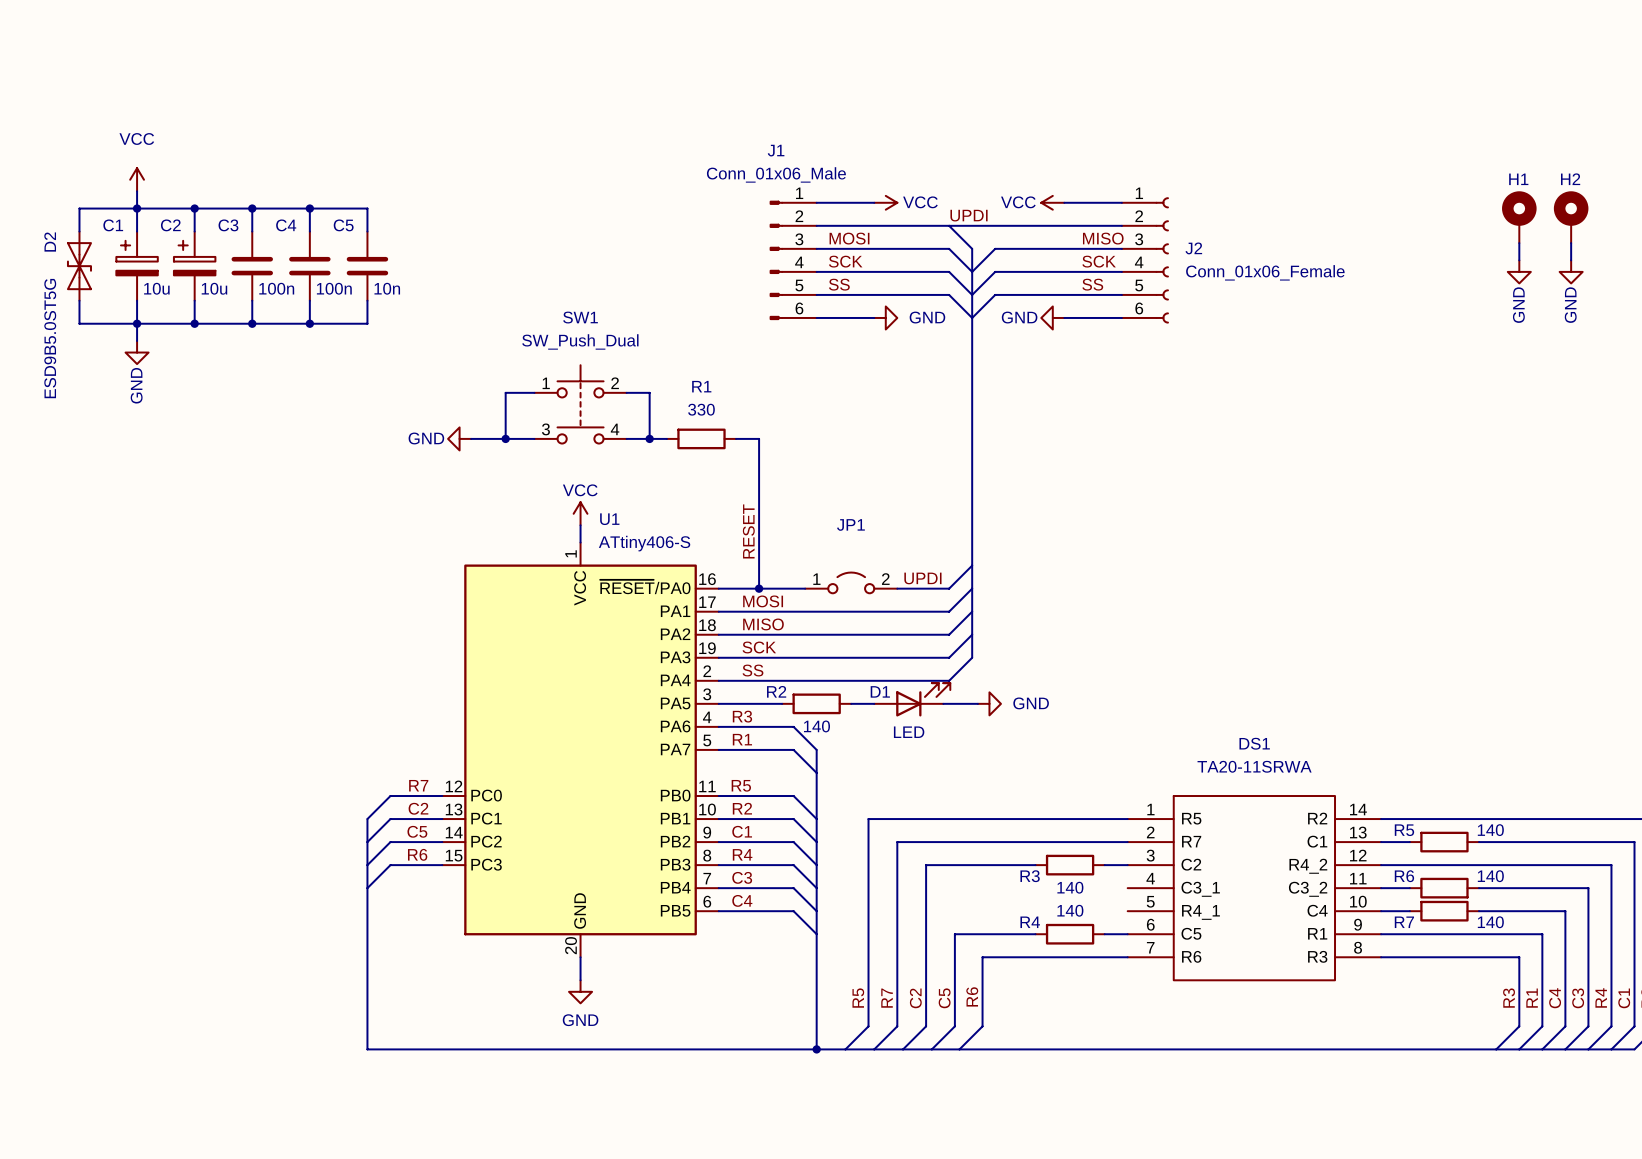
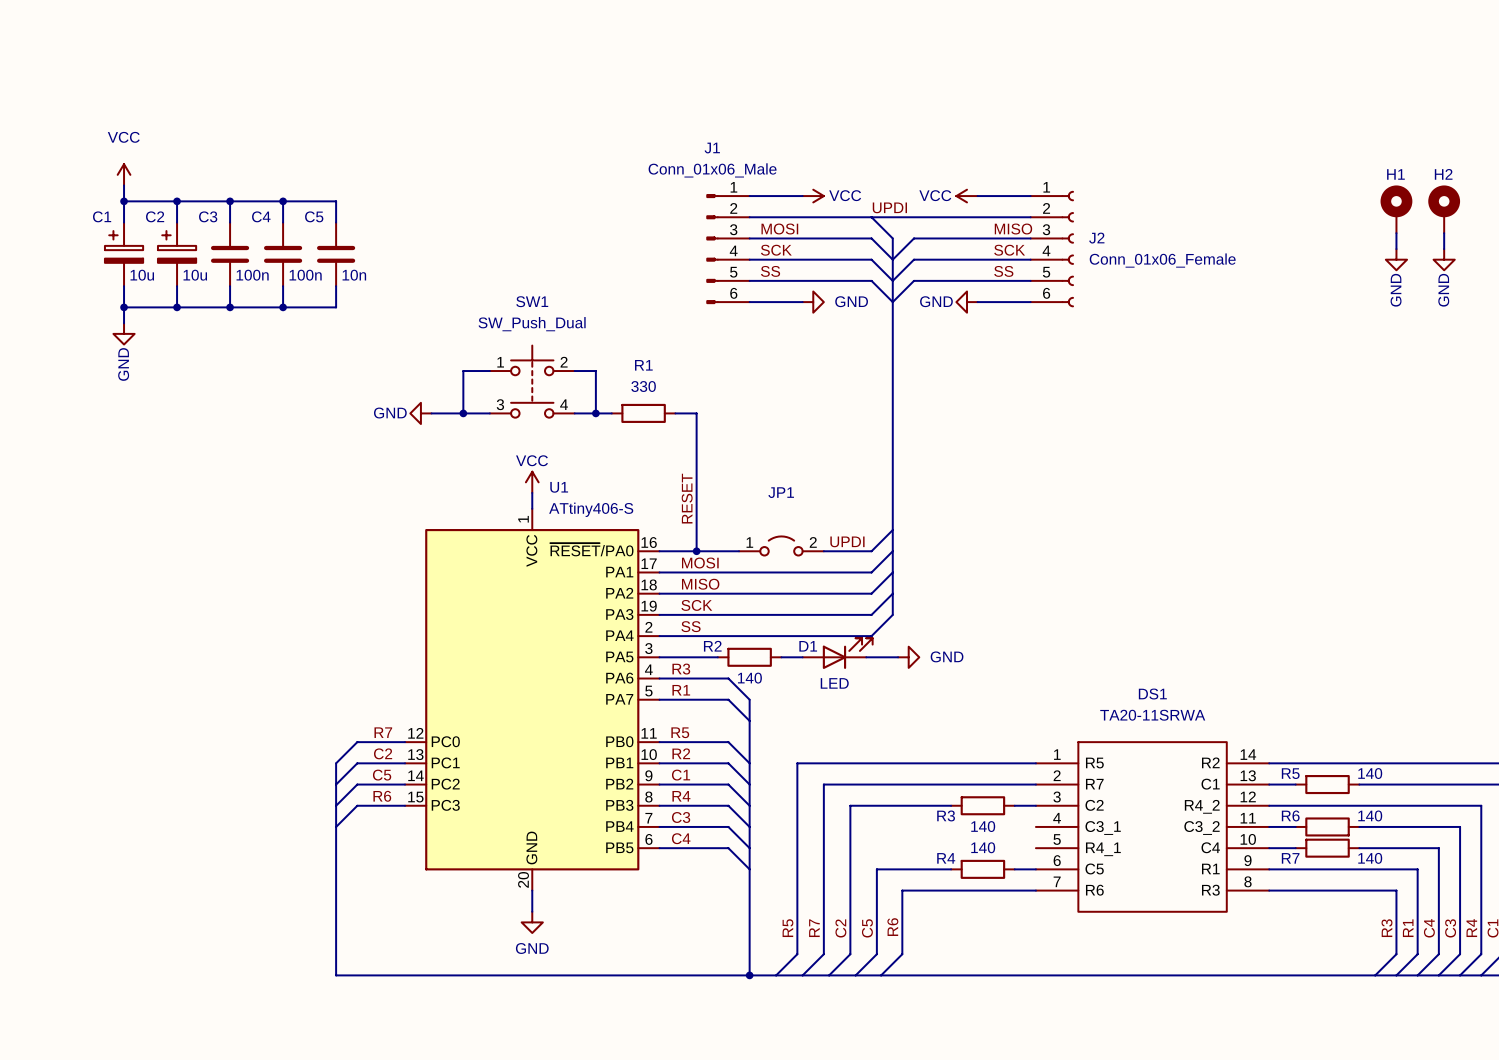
wire: (137, 208) (79, 208) (79, 231) -> none
D2: ESD9B5.0ST5G (79, 266) -> none
wire: (79, 300) (79, 323) (137, 323) -> none

